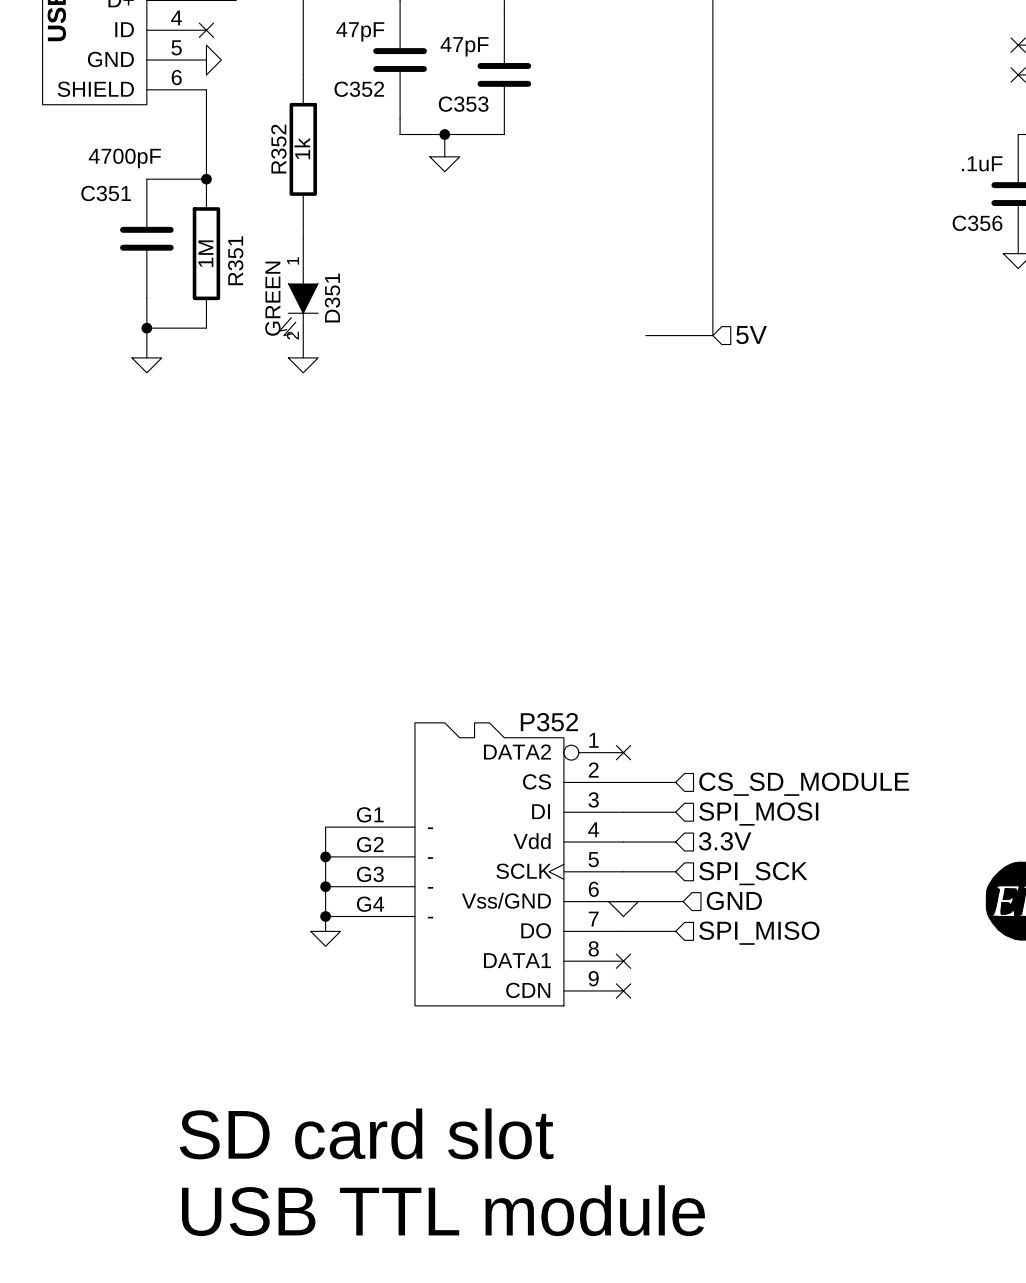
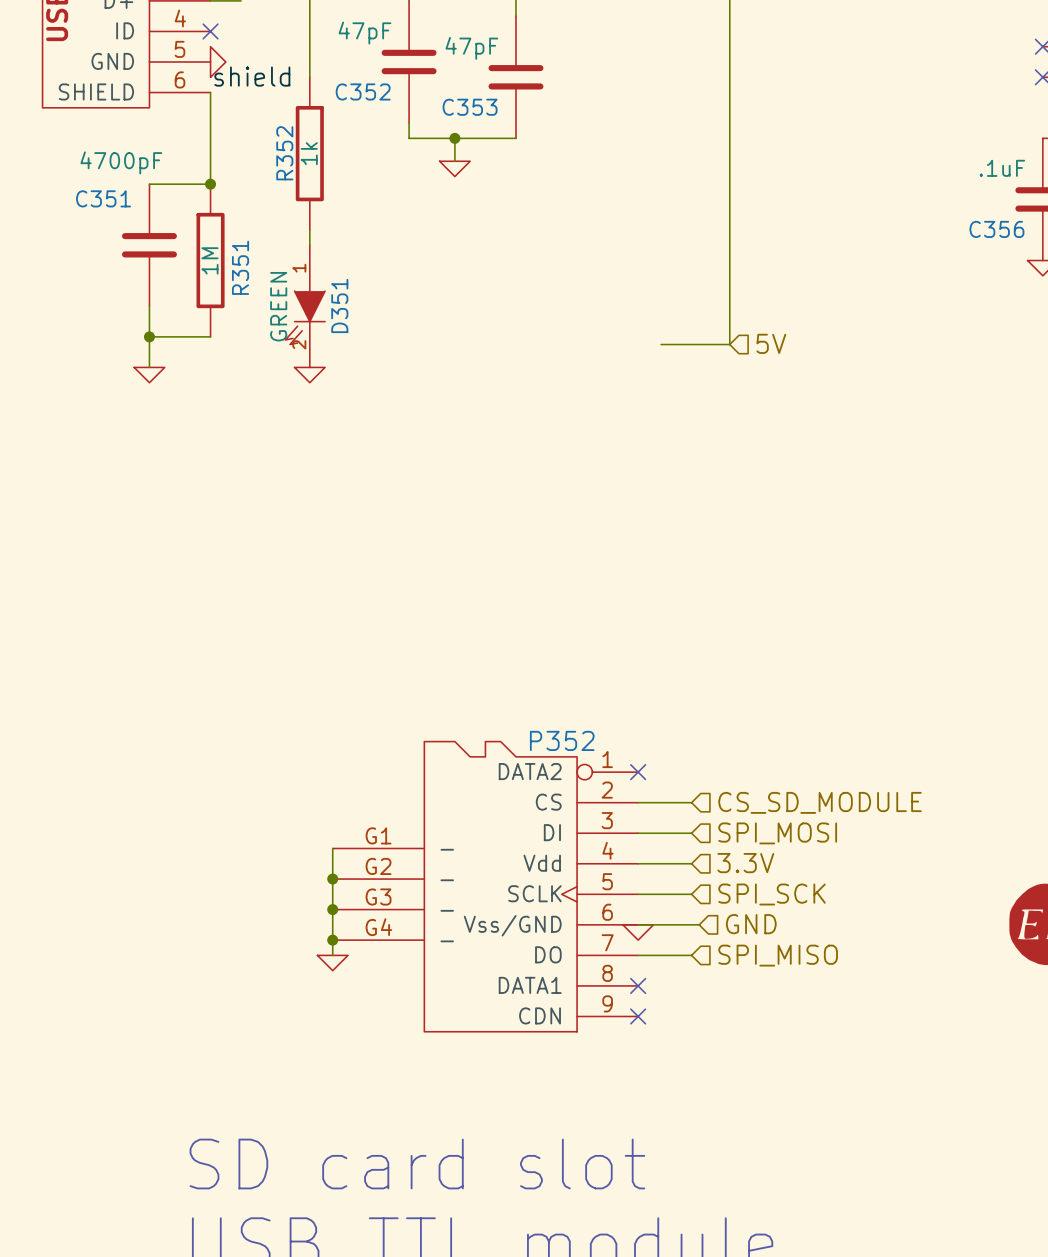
label: none -> shield (252, 76)

